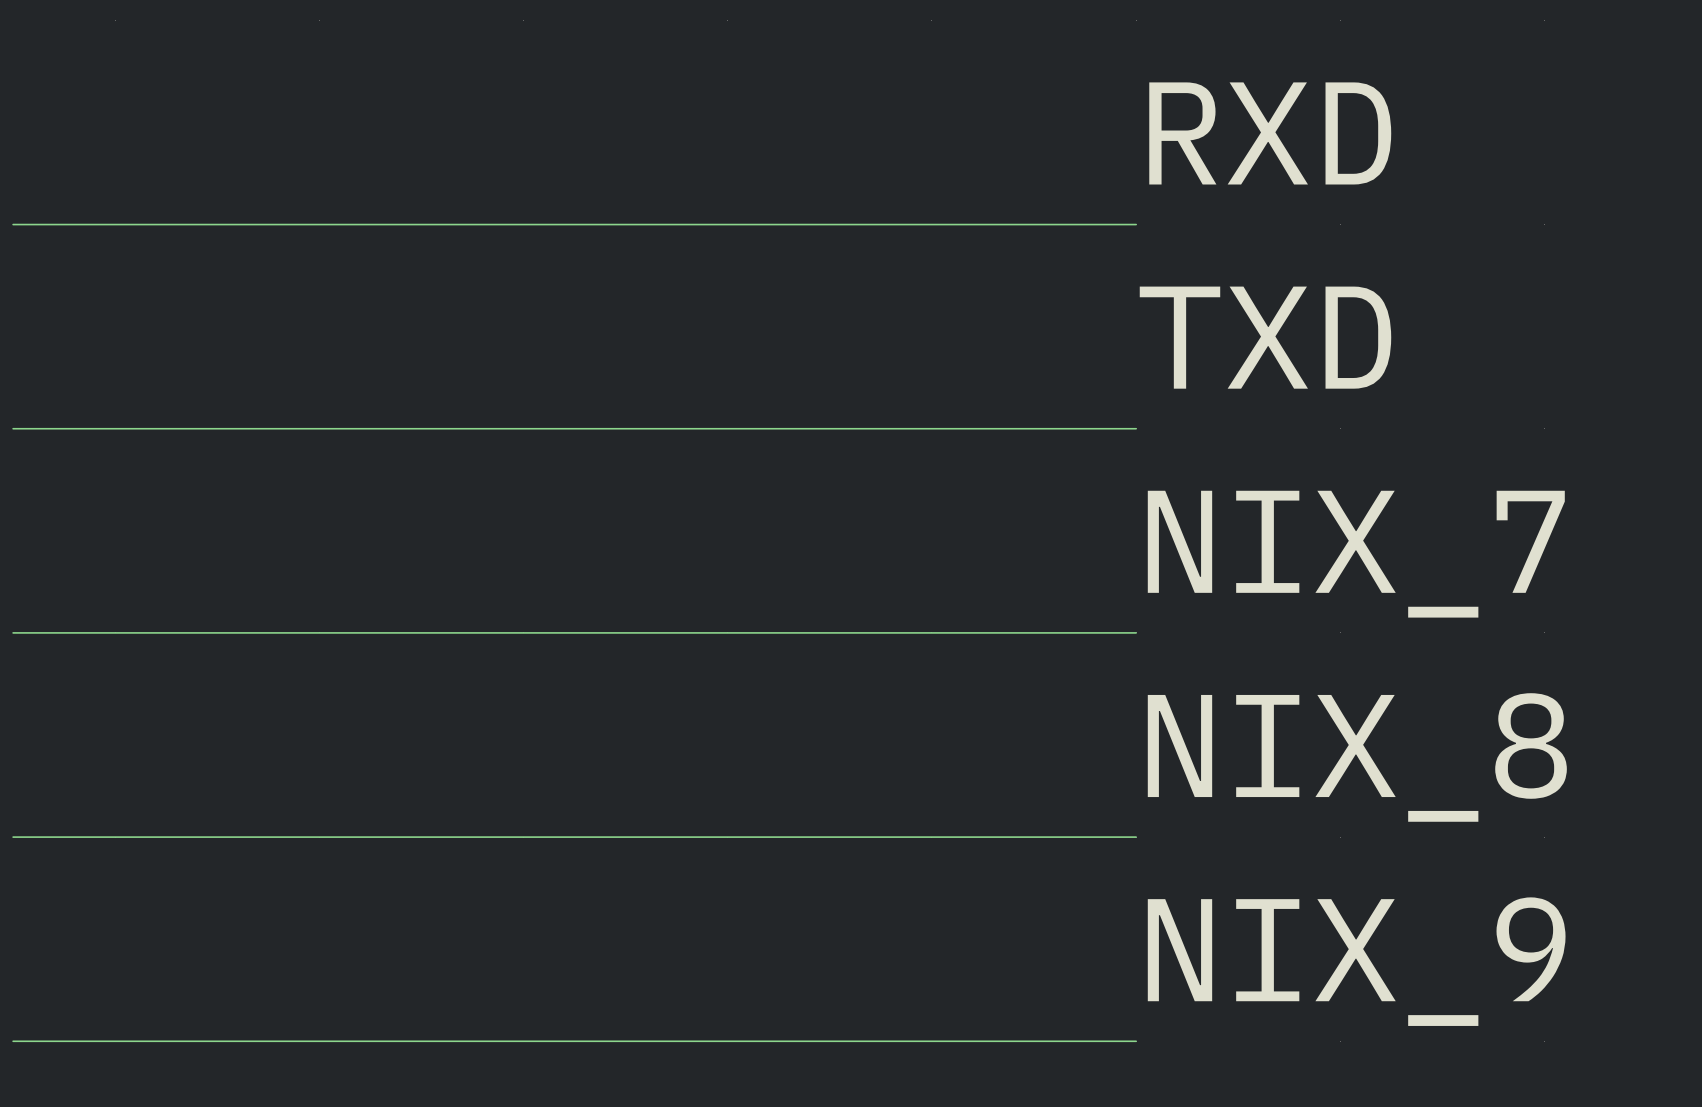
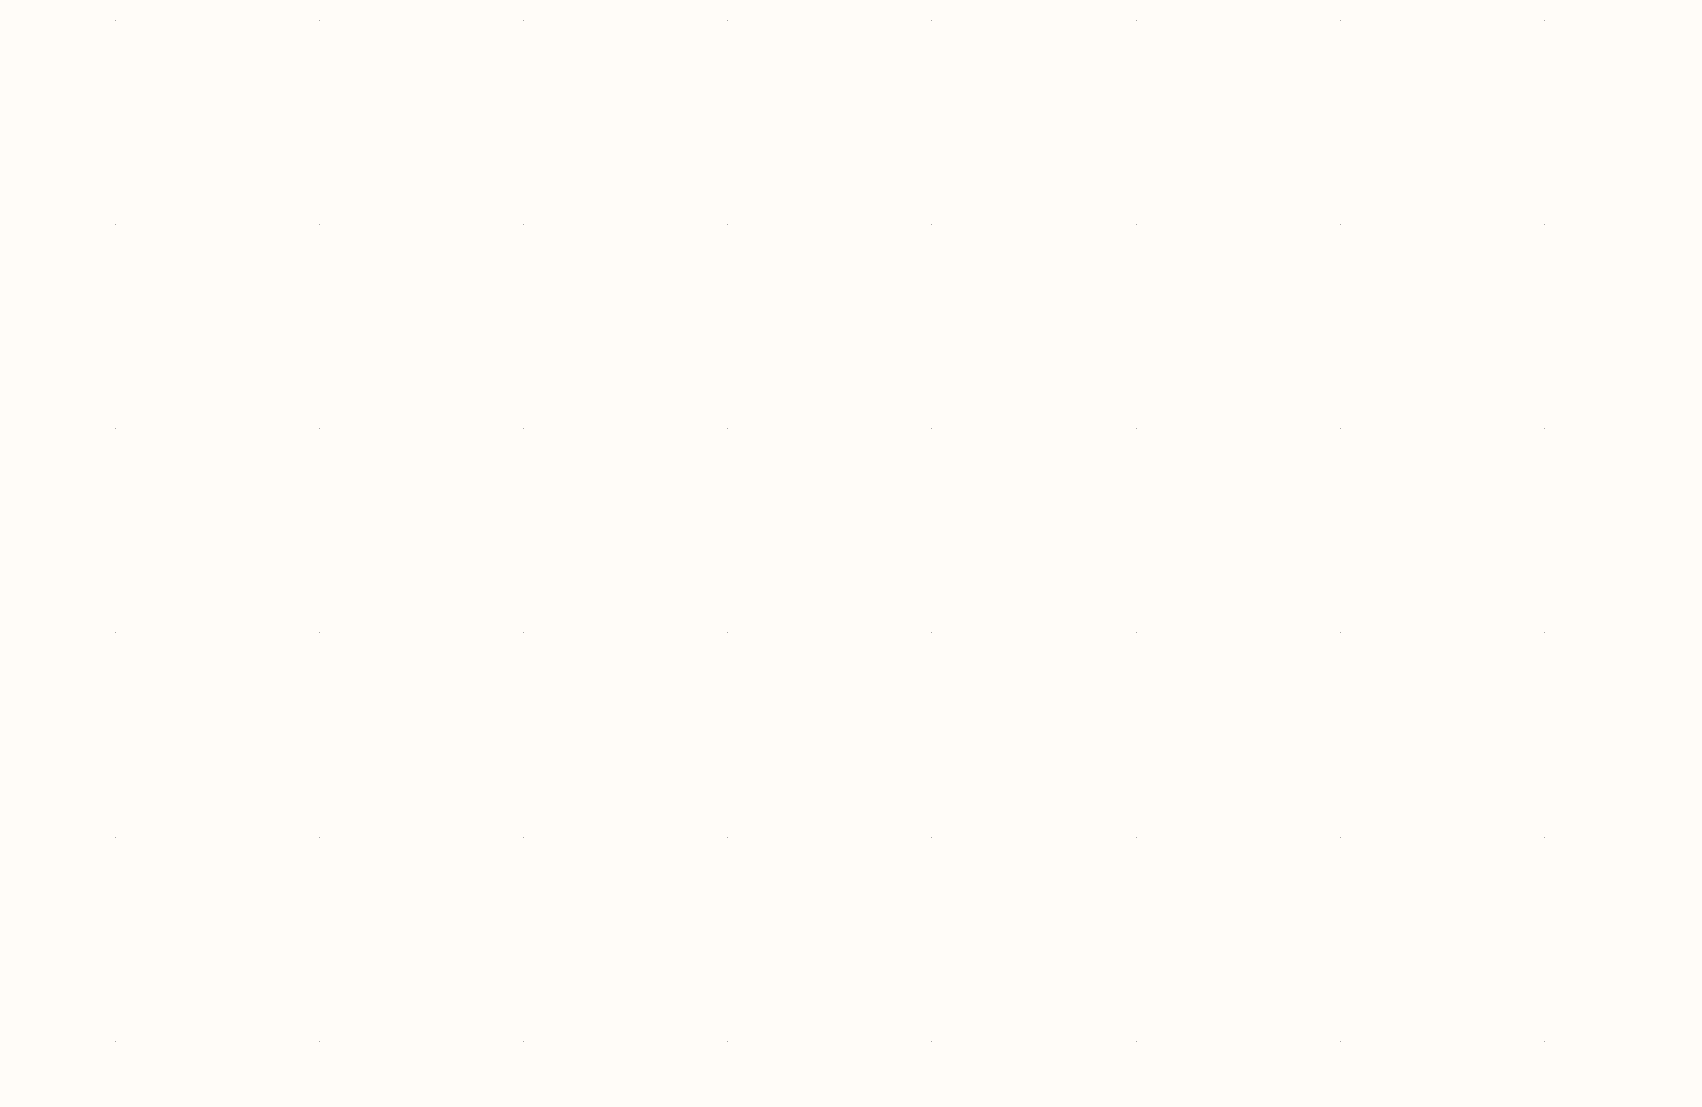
label: RXD (1270, 133) -> none
wire: (13, 224) (1136, 224) -> none
label: TXD (1265, 337) -> none
wire: (13, 428) (1136, 428) -> none
label: NIX_7 (1356, 554) -> none
wire: (13, 632) (1136, 632) -> none
label: NIX_8 (1357, 757) -> none
wire: (13, 837) (1136, 837) -> none
label: NIX_9 (1356, 961) -> none
wire: (13, 1041) (1136, 1041) -> none

